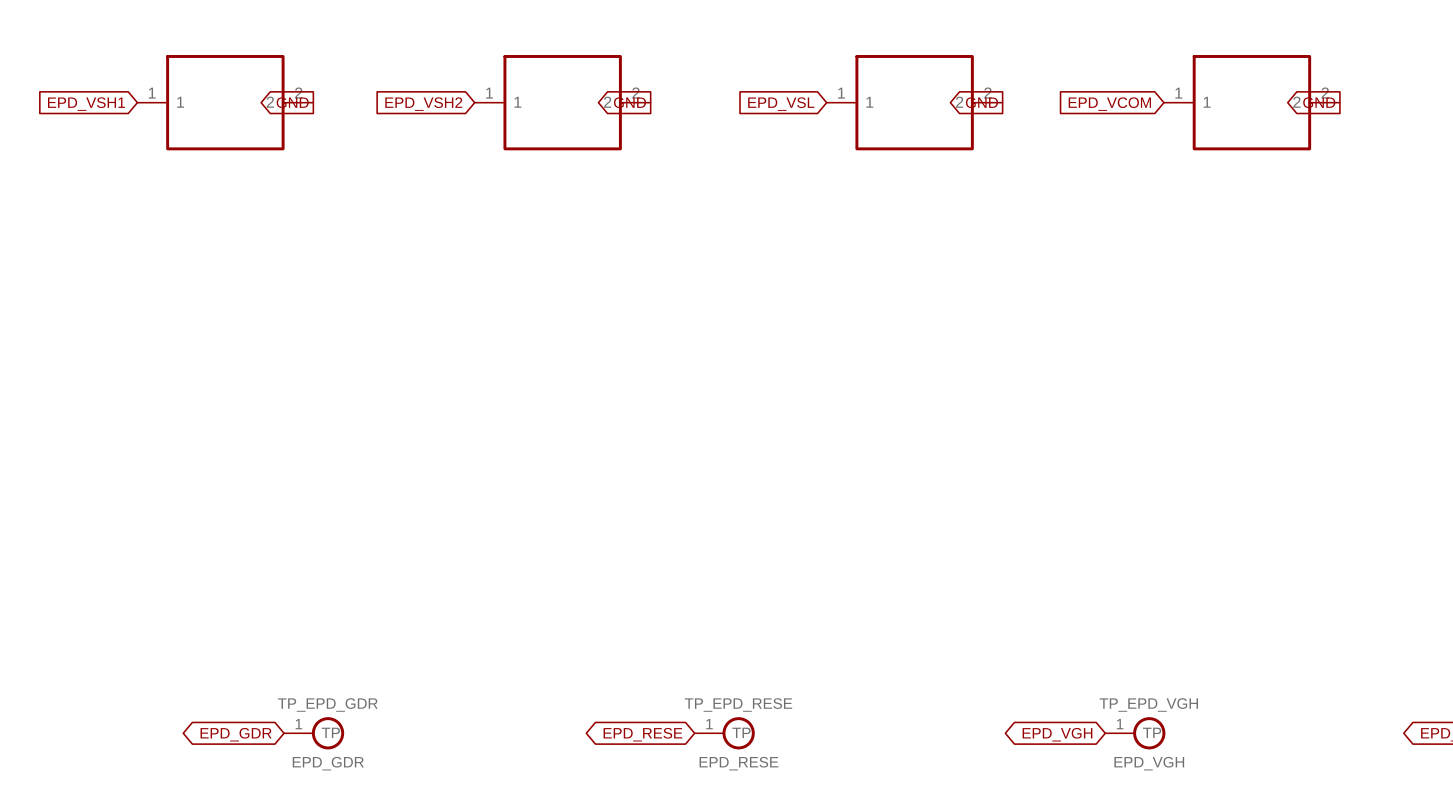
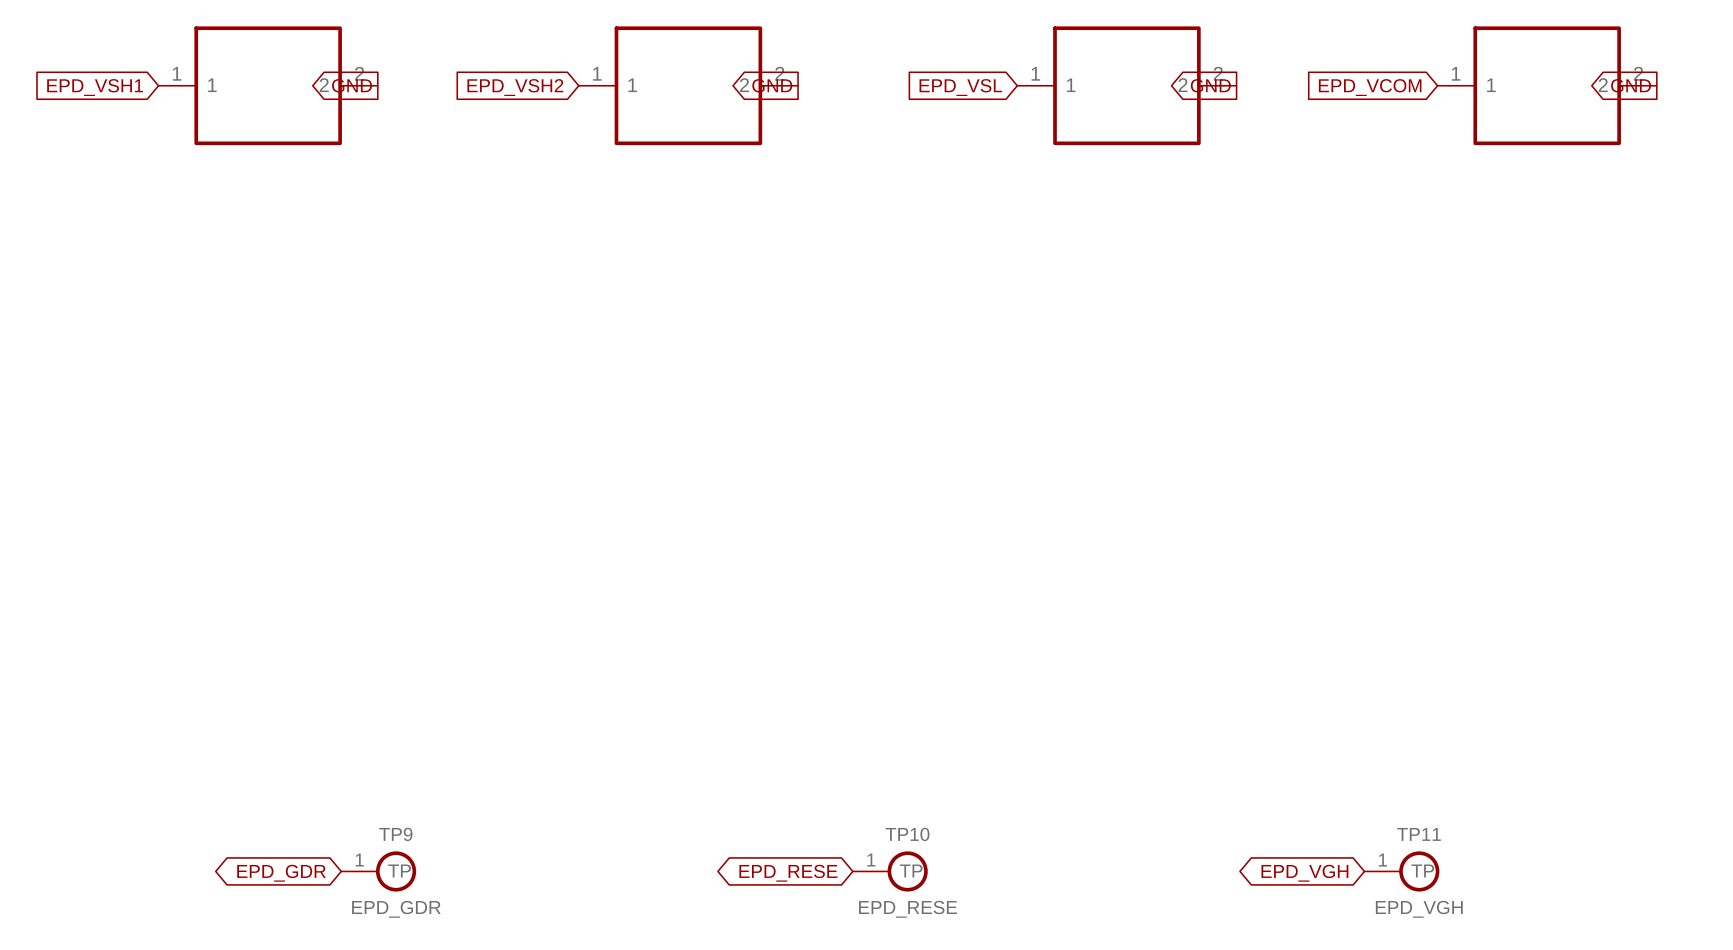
TP_EPD_GDR name: TP_EPD_GDR (327, 704) -> TP9 (395, 834)
TP_EPD_RESE name: TP_EPD_RESE (738, 704) -> TP10 (907, 834)
TP_EPD_VGH name: TP_EPD_VGH (1148, 704) -> TP11 (1419, 834)

